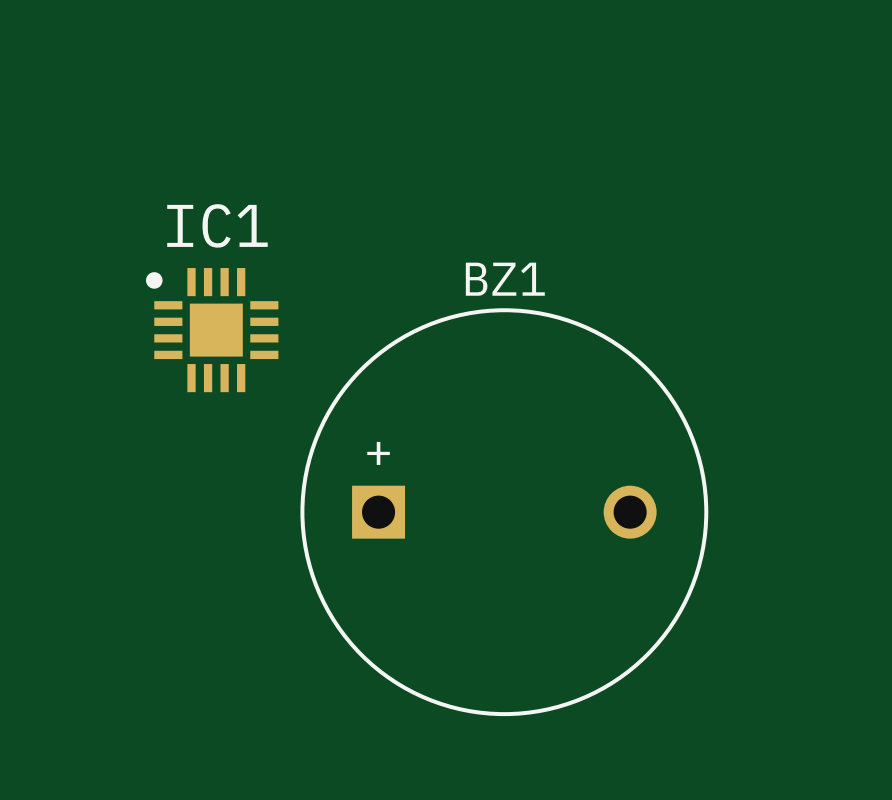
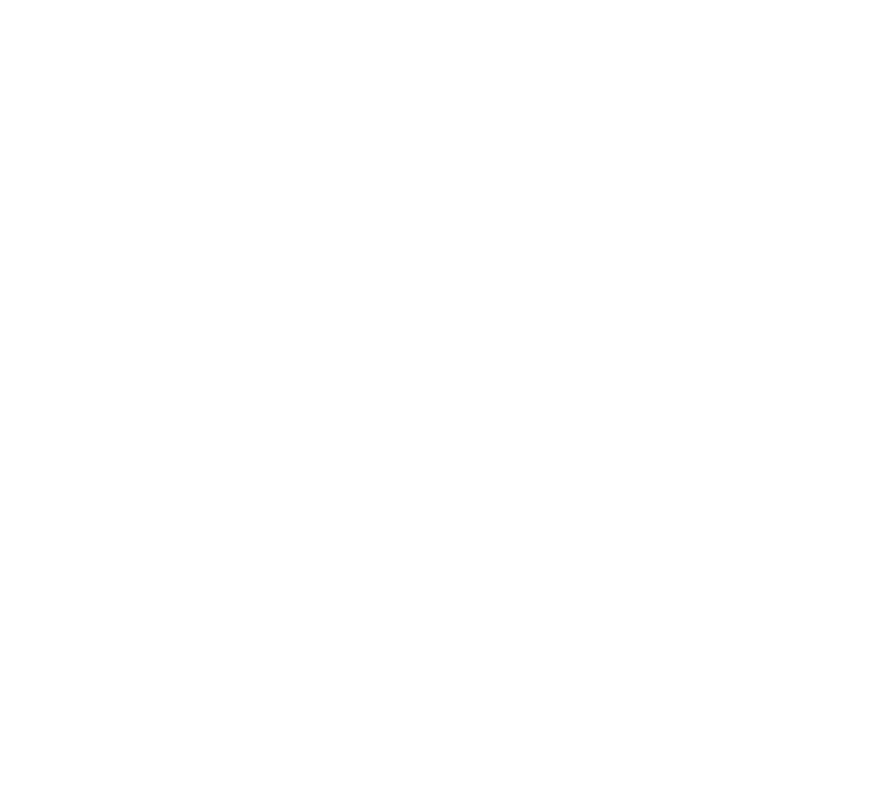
IC1: (212, 330) -> none
BZ1: (504, 512) -> none

